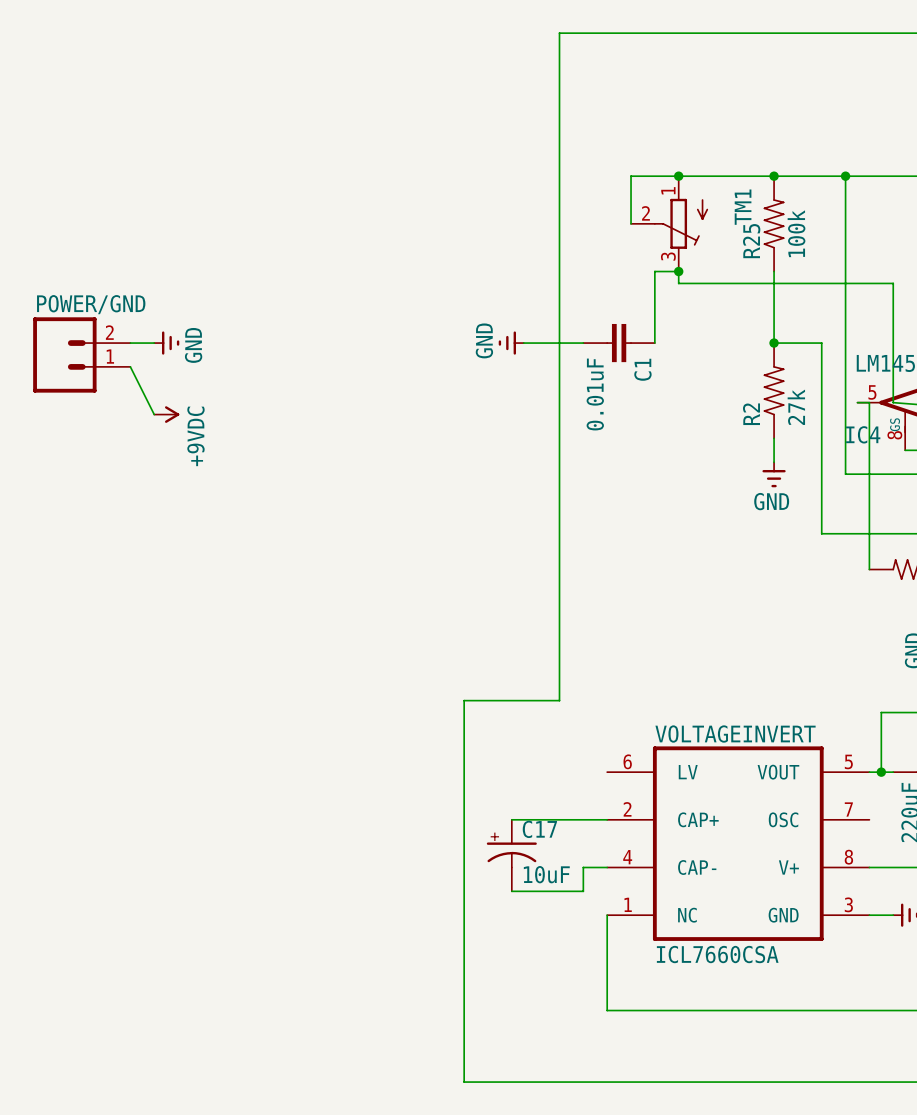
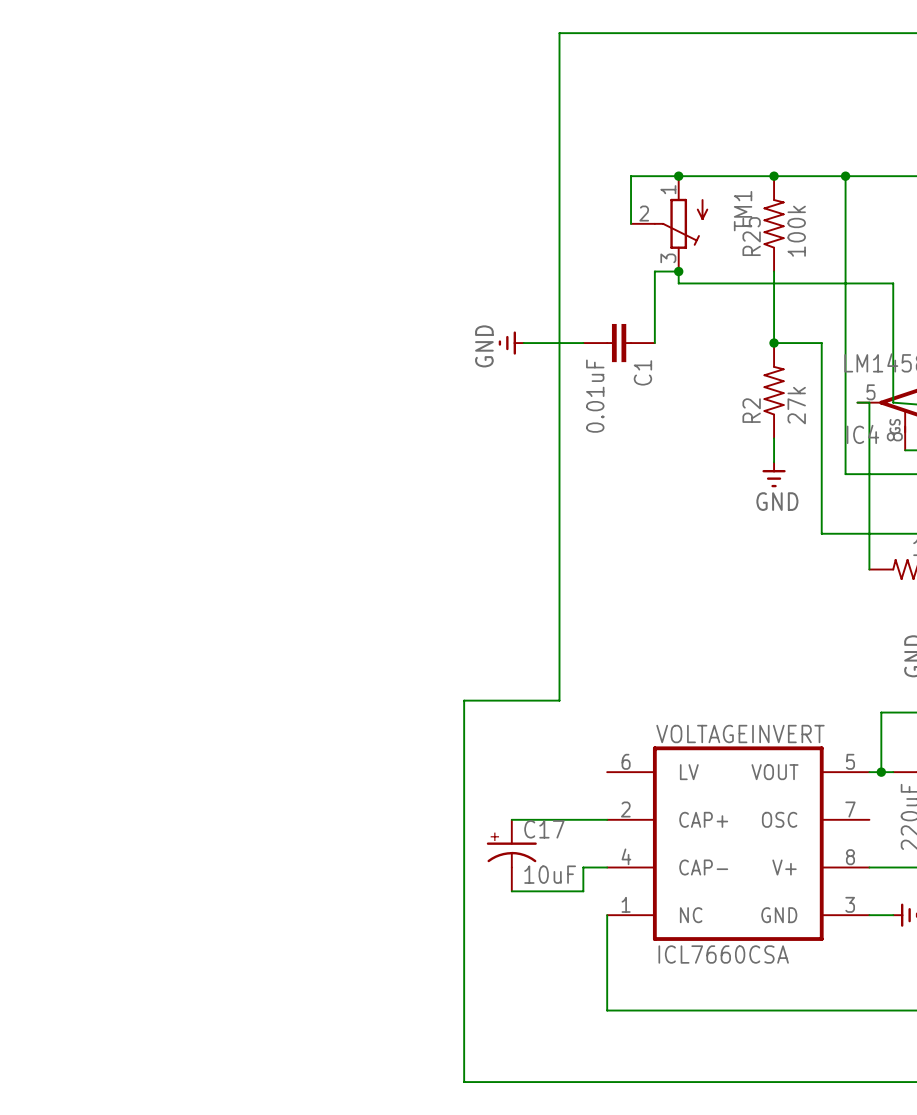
wire: (130, 343) (154, 343) -> none
power symbol: GND (166, 343) -> none
POWER/GND: (81, 354) -> none
wire: (130, 366) (154, 414) -> none
power symbol: +9VDC (166, 414) -> none

